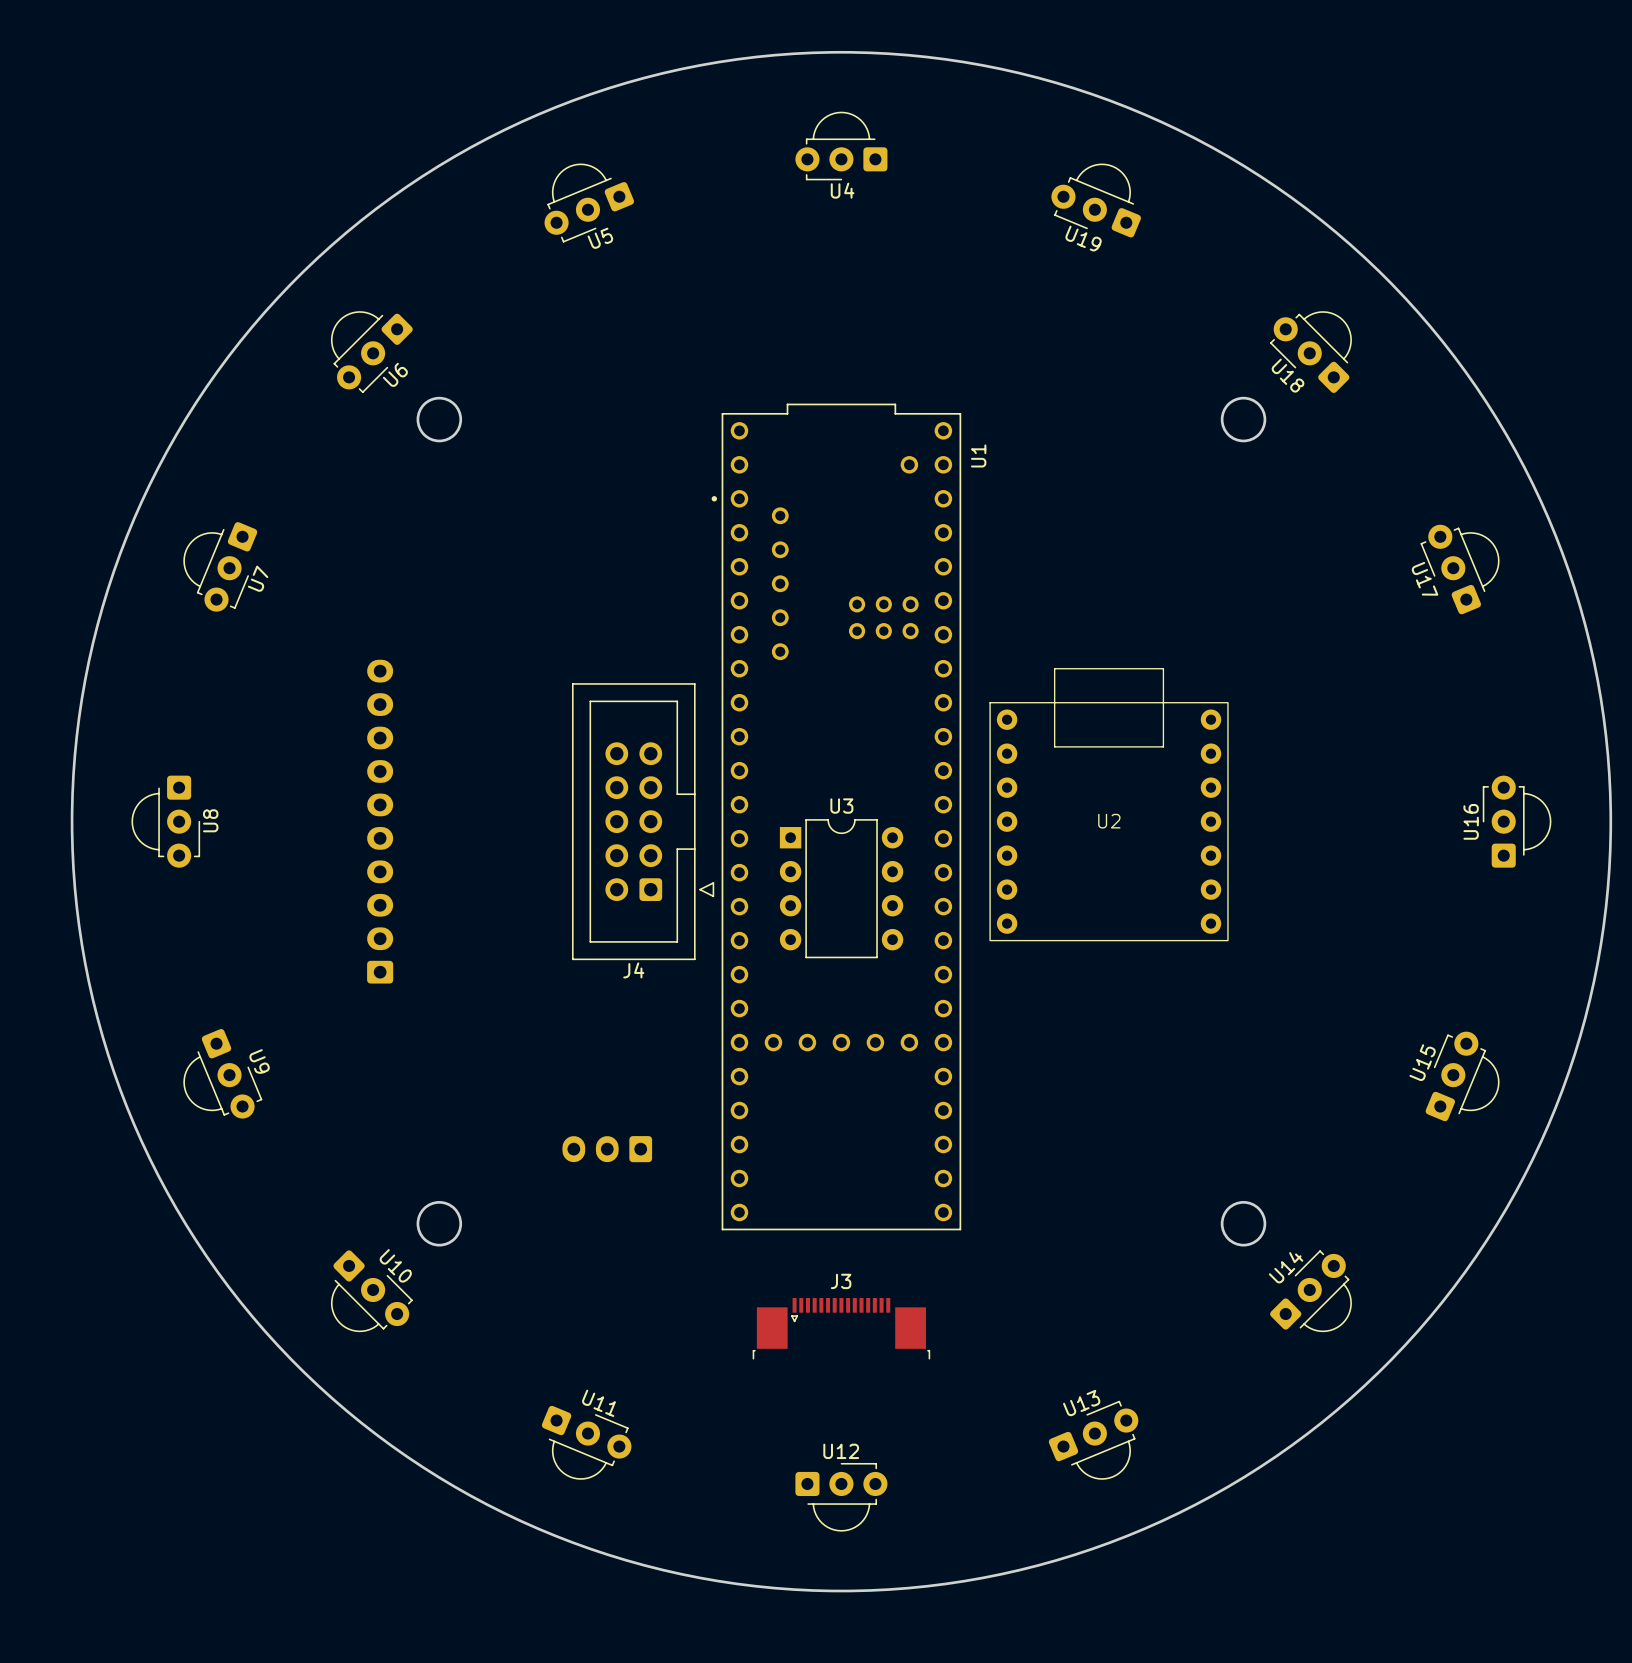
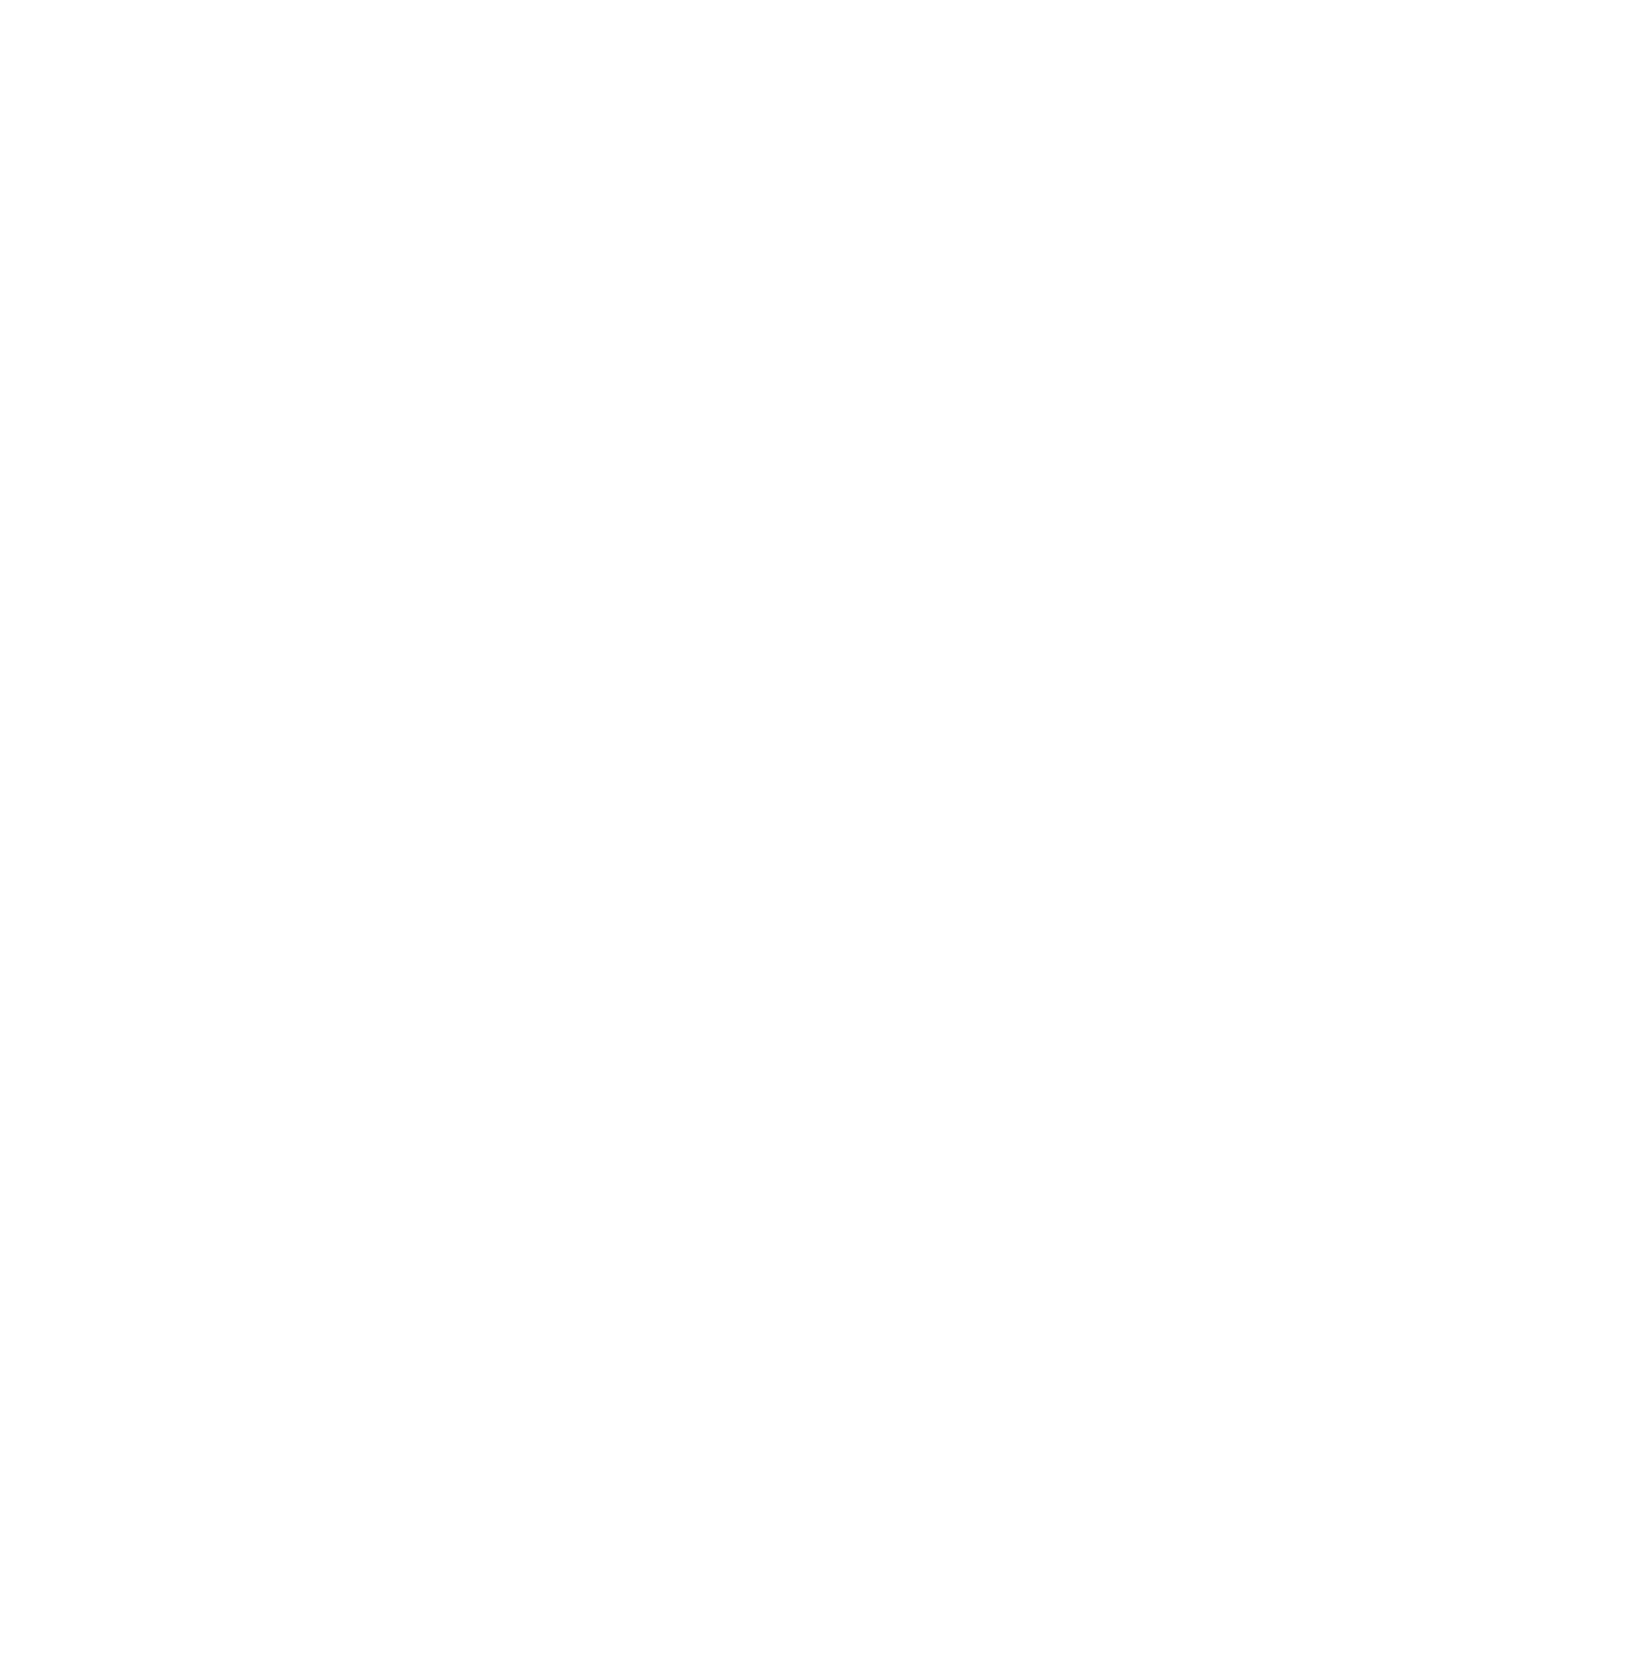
round board edge: [70, 50, 1613, 1593] -> none
U4: (841, 146) -> none
U19: (1096, 200) -> none
U5: (589, 203) -> none
U6: (371, 352) -> none
U18: (1310, 352) -> none
round board edge: [416, 396, 463, 443] -> none
round board edge: [1220, 396, 1267, 443] -> none
U7: (220, 566) -> none
U17: (1460, 569) -> none
U2: (1109, 804) -> none
U1: (836, 816) -> none
U8: (165, 821) -> none
part: (380, 821) -> none
J4: (643, 821) -> none
U16: (1517, 821) -> none
U3: (841, 888) -> none
U9: (222, 1073) -> none
U15: (1462, 1076) -> none
part: (607, 1149) -> none
round board edge: [416, 1201, 463, 1247] -> none
round board edge: [1220, 1201, 1267, 1247] -> none
U10: (371, 1291) -> none
U14: (1311, 1291) -> none
J3: (841, 1328) -> none
U13: (1093, 1440) -> none
U11: (586, 1442) -> none
U12: (841, 1497) -> none

